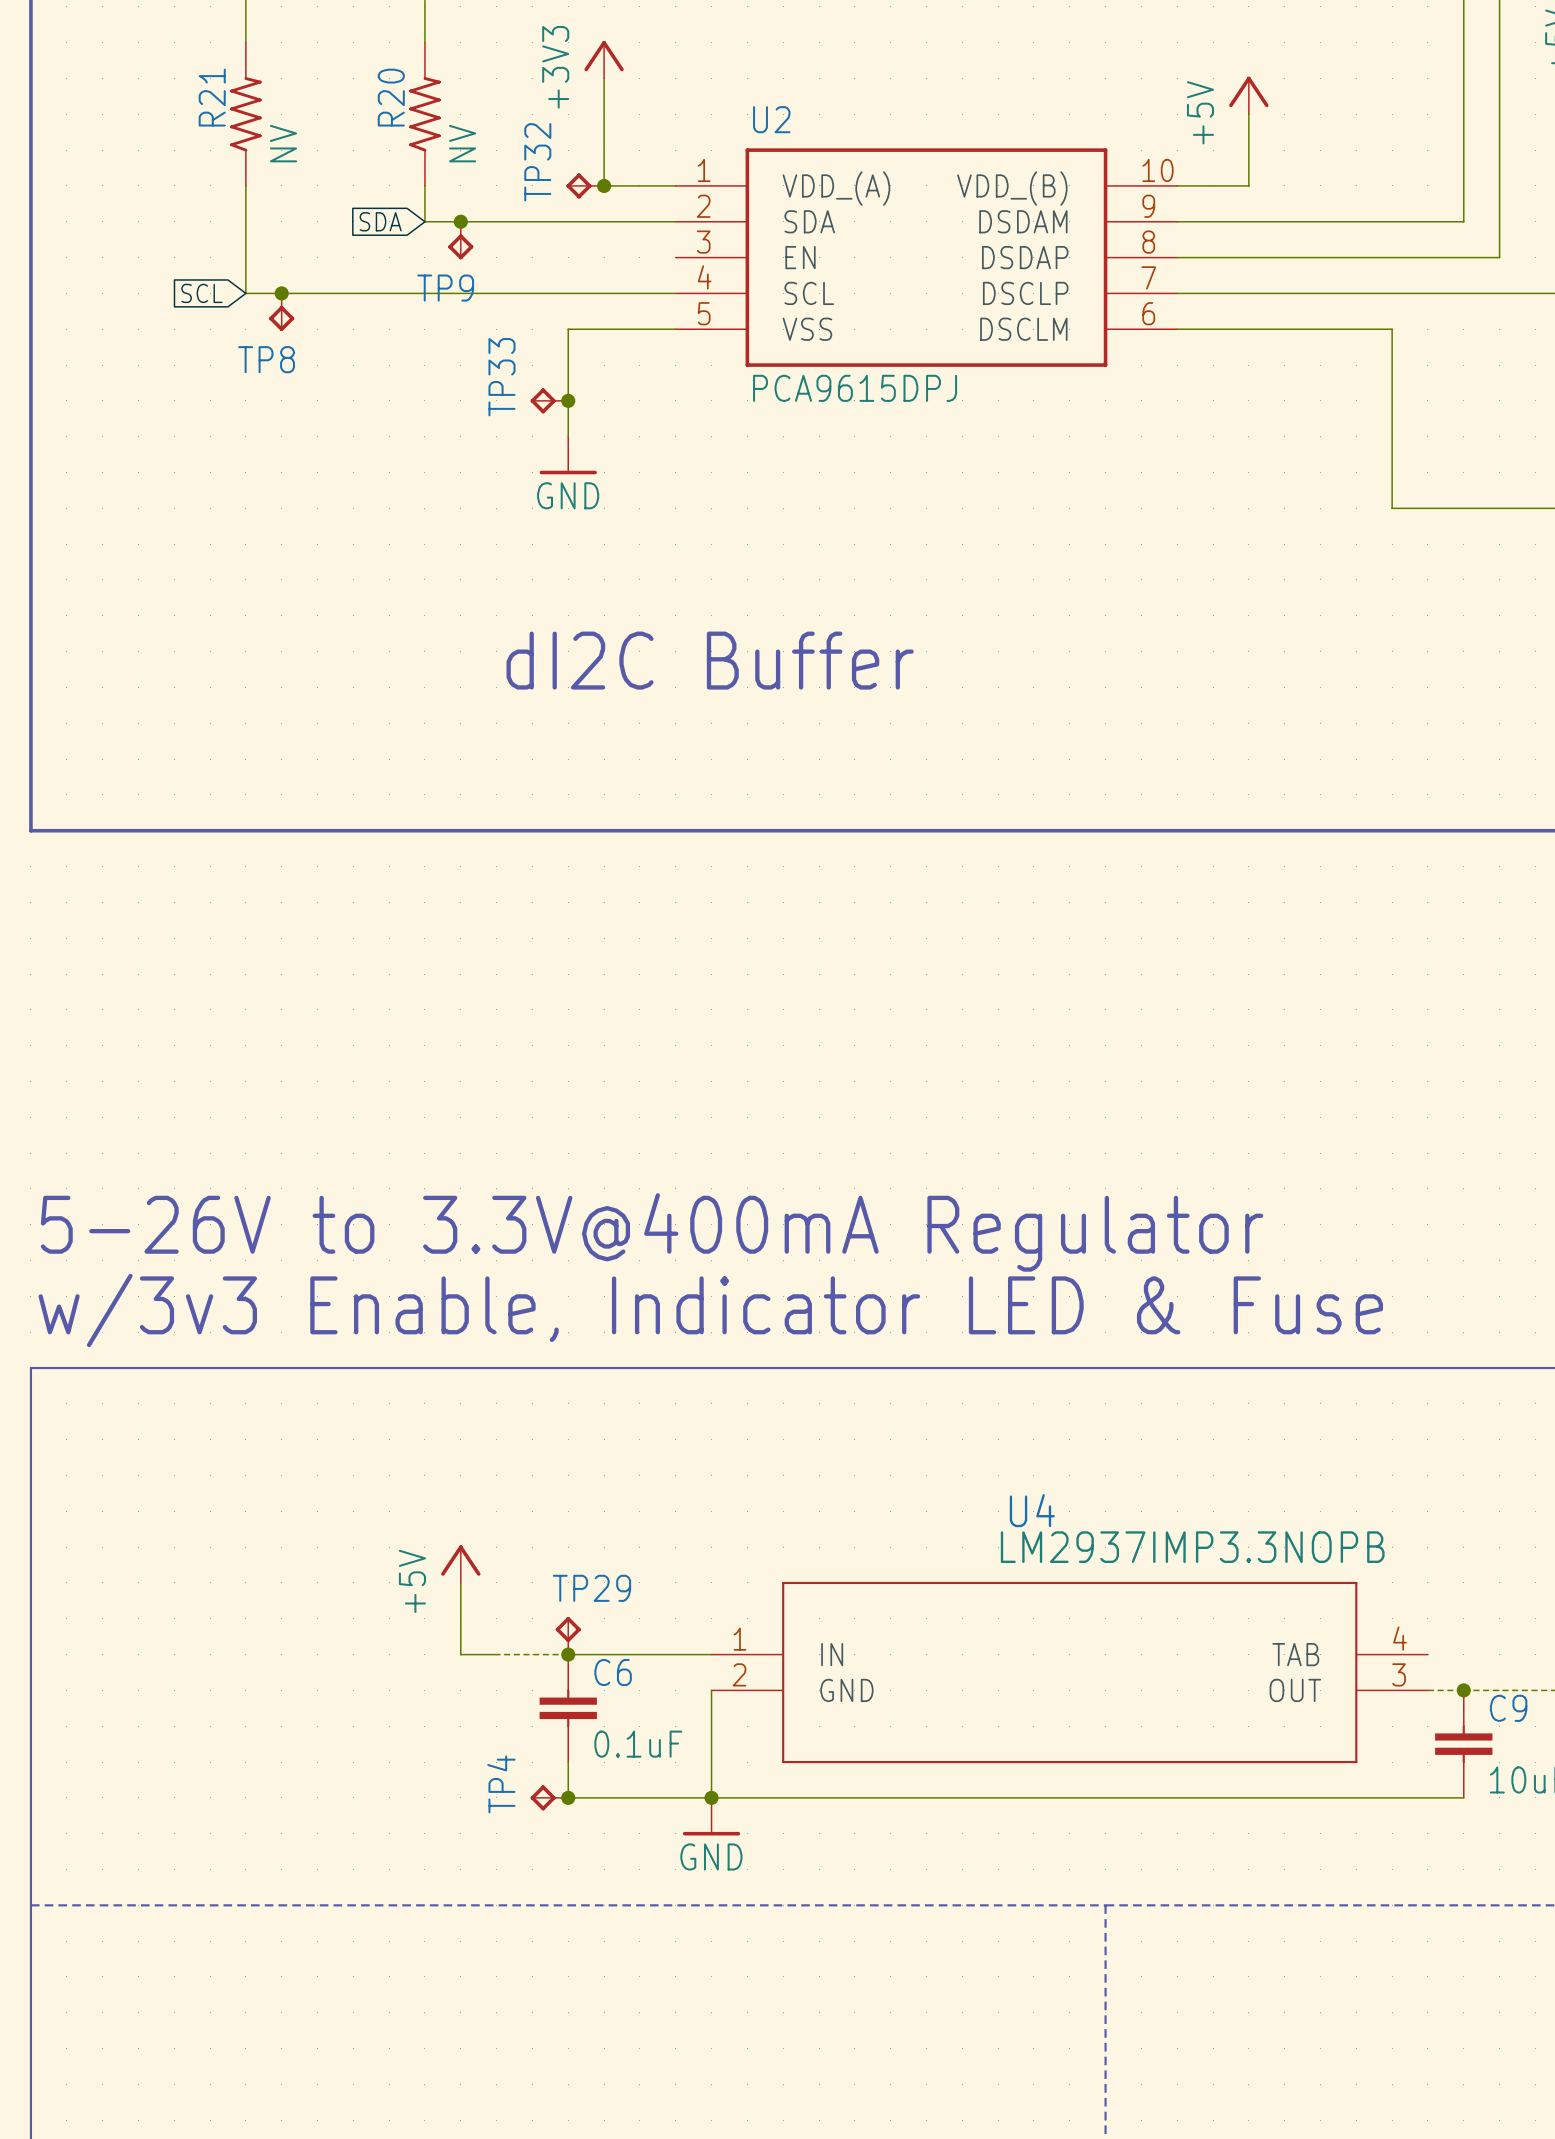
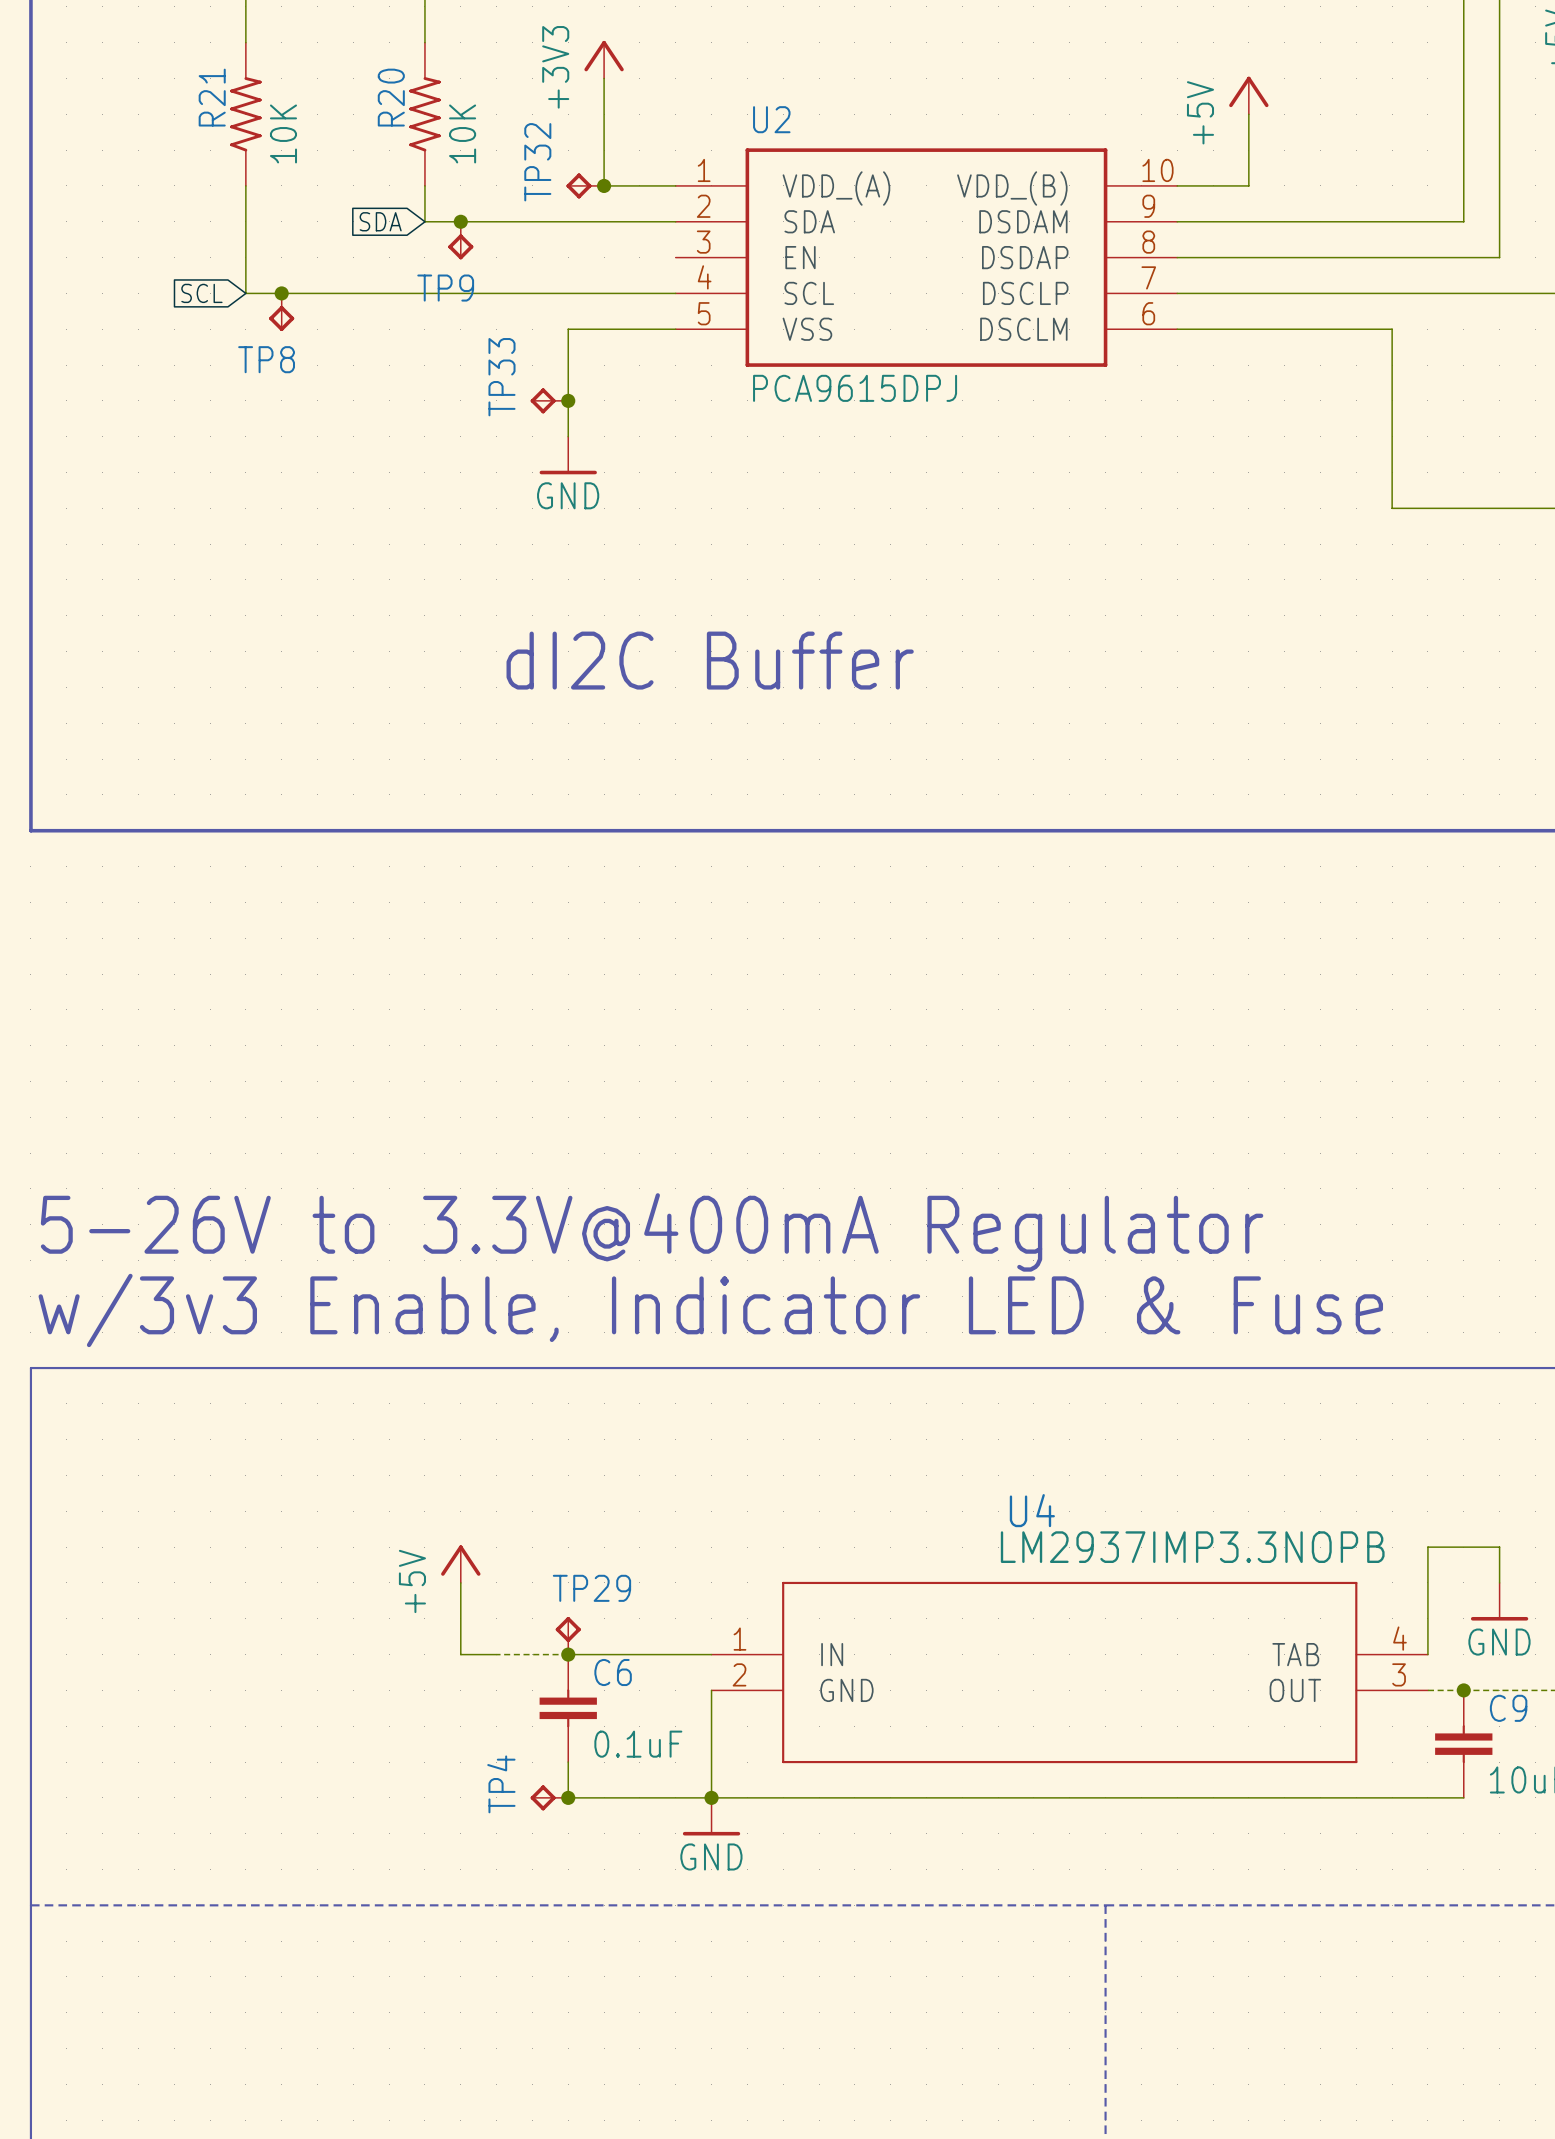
R21 value: NV (283, 143) -> 10K (283, 133)
R20 value: NV (462, 143) -> 10K (462, 133)
wire: none -> (1499, 1582) (1499, 1547) (1427, 1547) (1427, 1654)
power symbol: none -> GND (1499, 1601)

